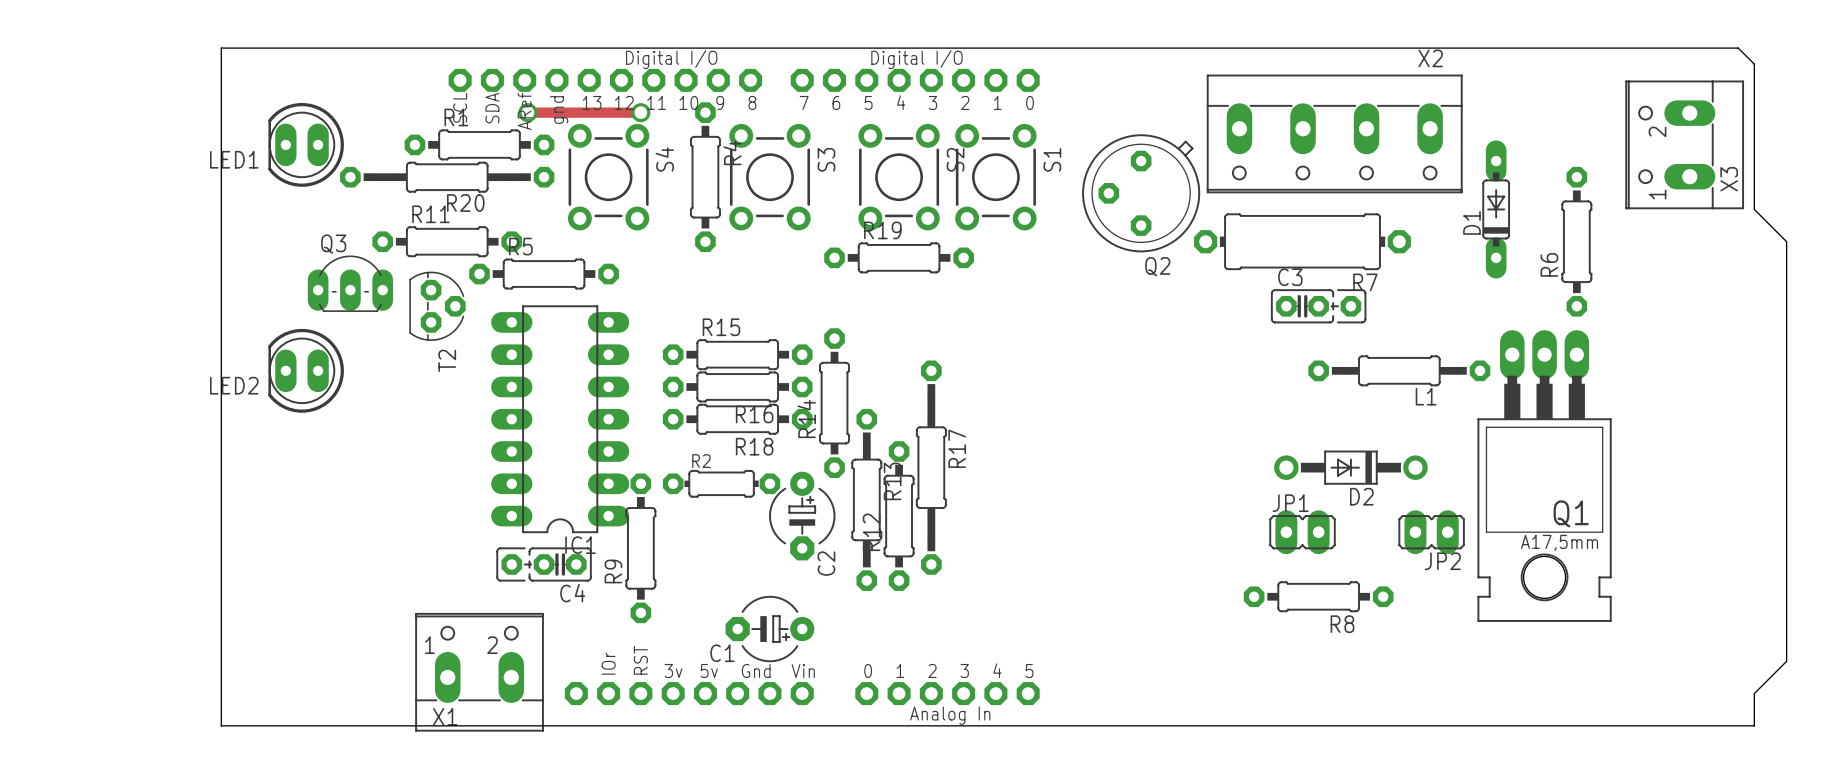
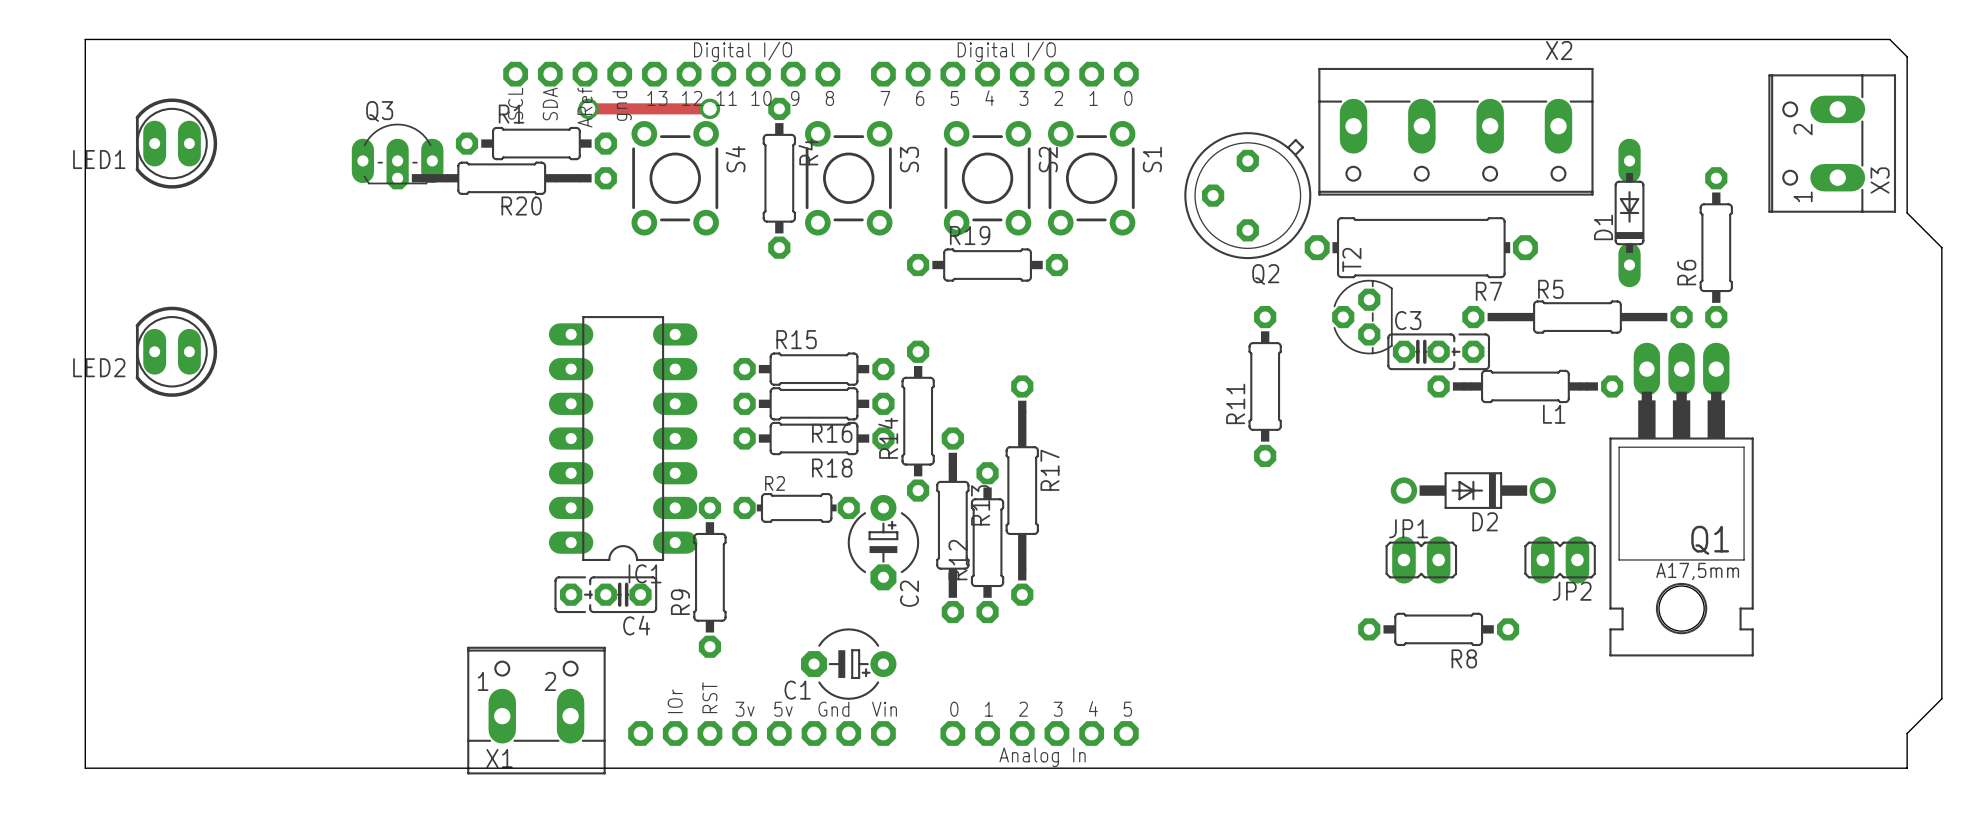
board edge: (221, 48) (221, 725) -> (258, 39) (85, 39) (85, 768) (258, 768)
LED1 position: (306, 144) -> (176, 143)
R11 name position: R11 (431, 214) -> R11 (1235, 403)
R11 rotation: 0° (447, 241) -> 90° clockwise (1265, 386)
R11 position: (447, 241) -> (1265, 386)
R5 footprint: [469, 258, 619, 290] -> [1462, 300, 1693, 334]
Q3 position: (350, 283) -> (397, 153)
T2 rotation: 0° (437, 306) -> 180° (1362, 317)
T2 position: (437, 306) -> (1362, 317)
C3 position: (1318, 306) -> (1438, 351)
LED2 position: (306, 370) -> (176, 351)

